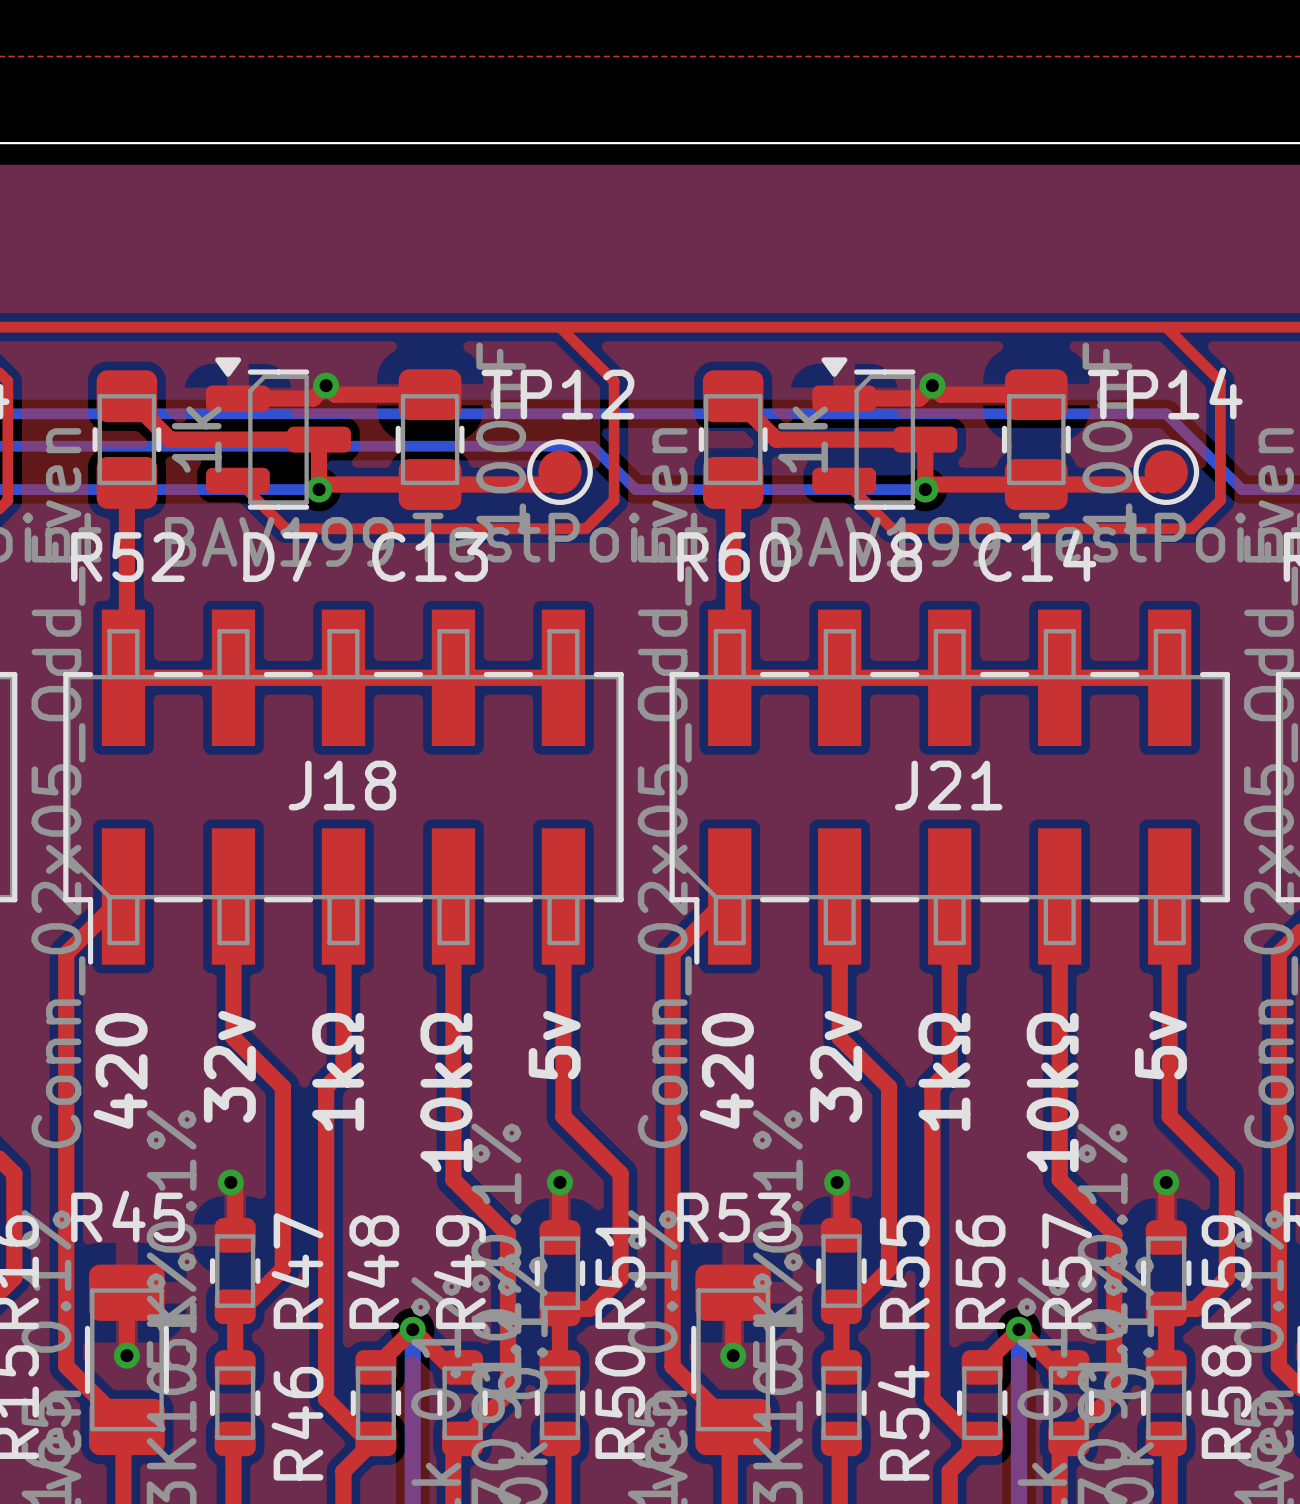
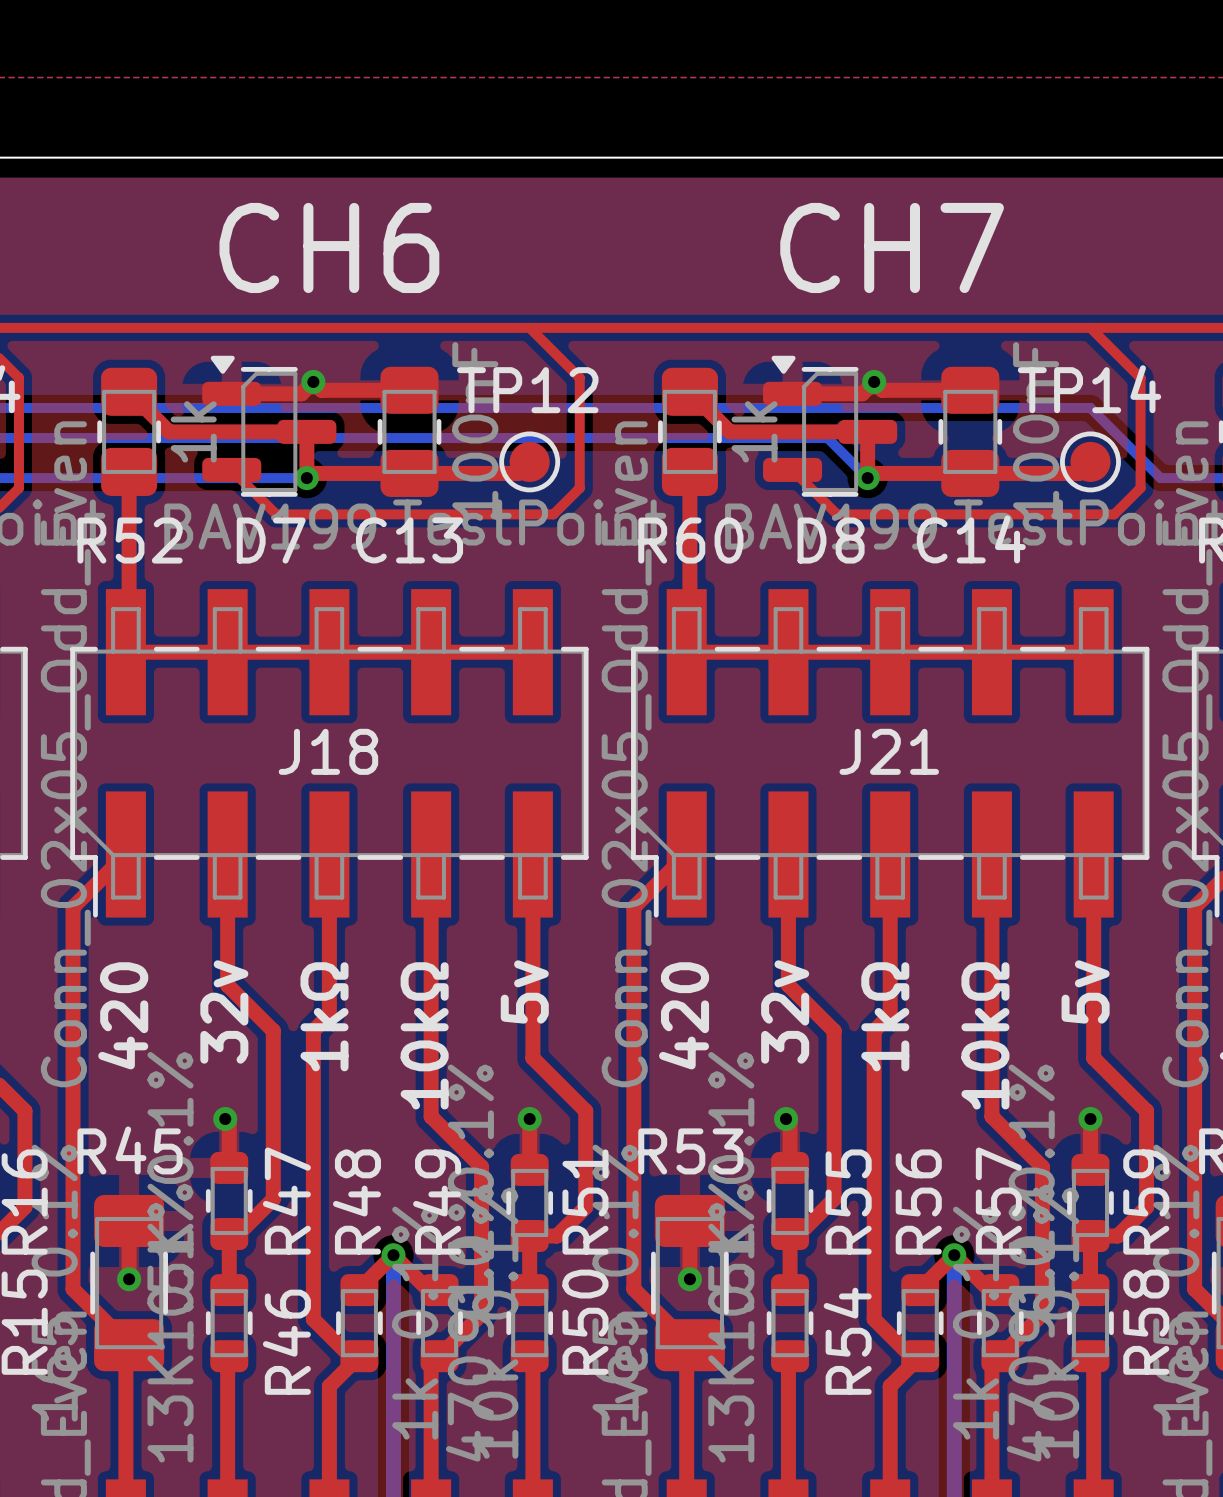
text: none -> CH6 (329, 247)
text: none -> CH7 (892, 247)
bottom track: (592, 446) (635, 489) (925, 489) -> (559, 438) (827, 438) (867, 478)

